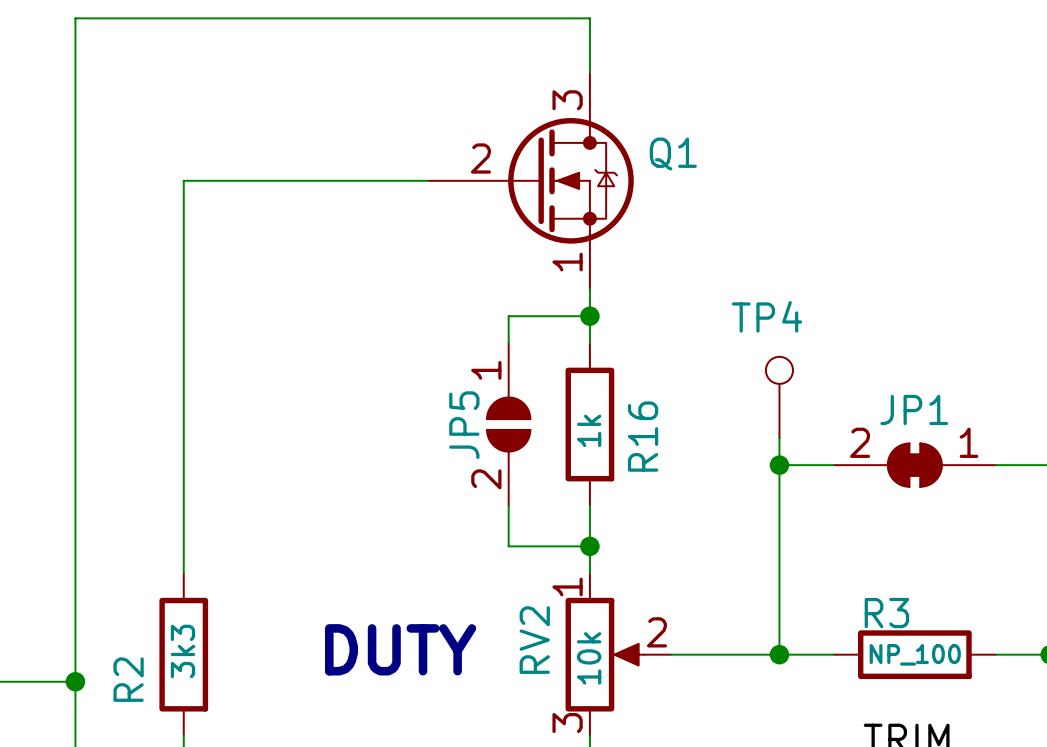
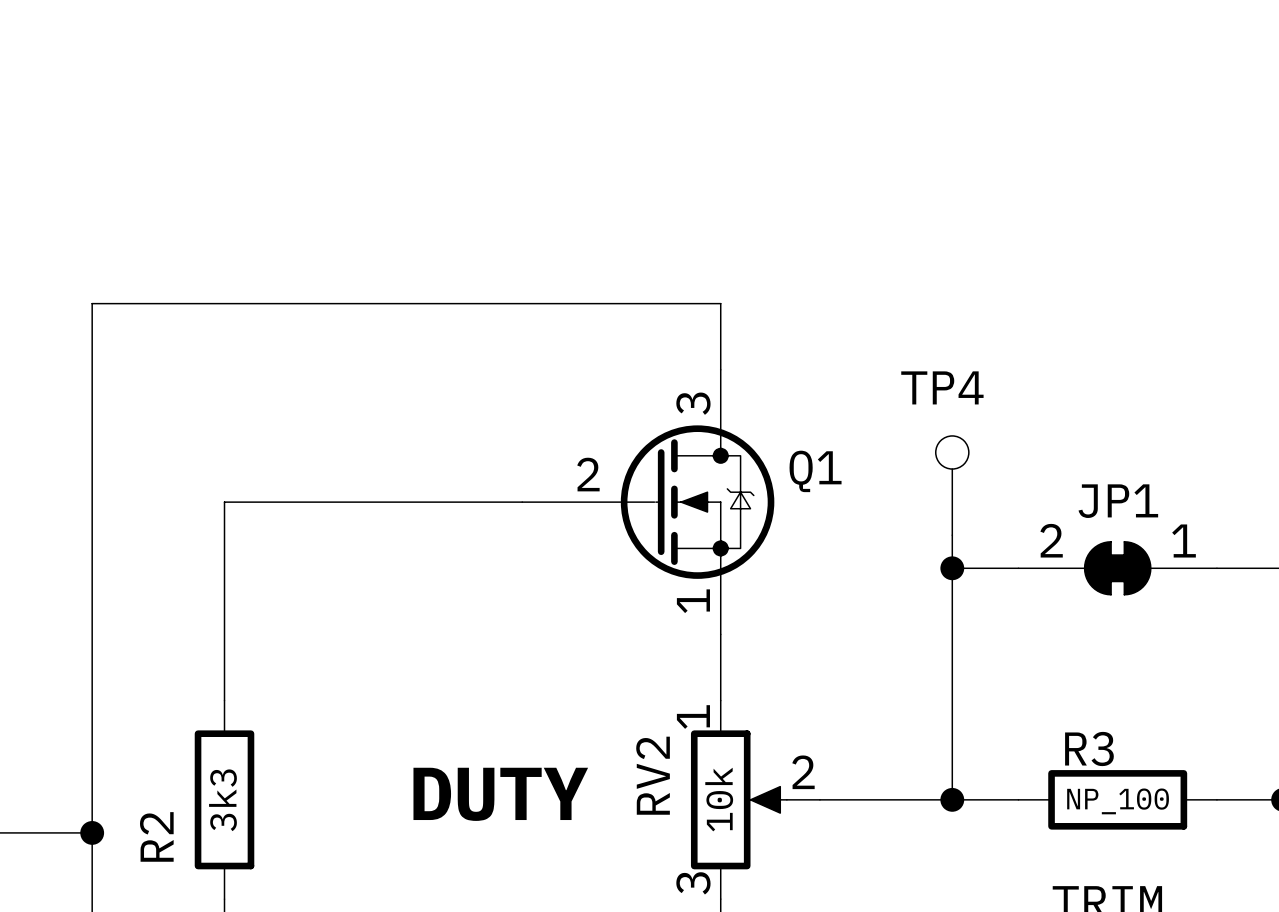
wire: (589, 72) (589, 18) (75, 18) (75, 248) -> (720, 353) (720, 303) (92, 303)
wire: (427, 180) (183, 180) (183, 410) -> (522, 502) (224, 502)
Q1 position: (530, 180) -> (648, 502)
wire: (589, 316) (508, 316) (508, 343) -> none
junction: (589, 316) -> none
JP5: (508, 424) -> none
R16: 1k (589, 424) -> none
wire: (508, 505) (508, 546) (589, 546) -> none
junction: (589, 546) -> none

